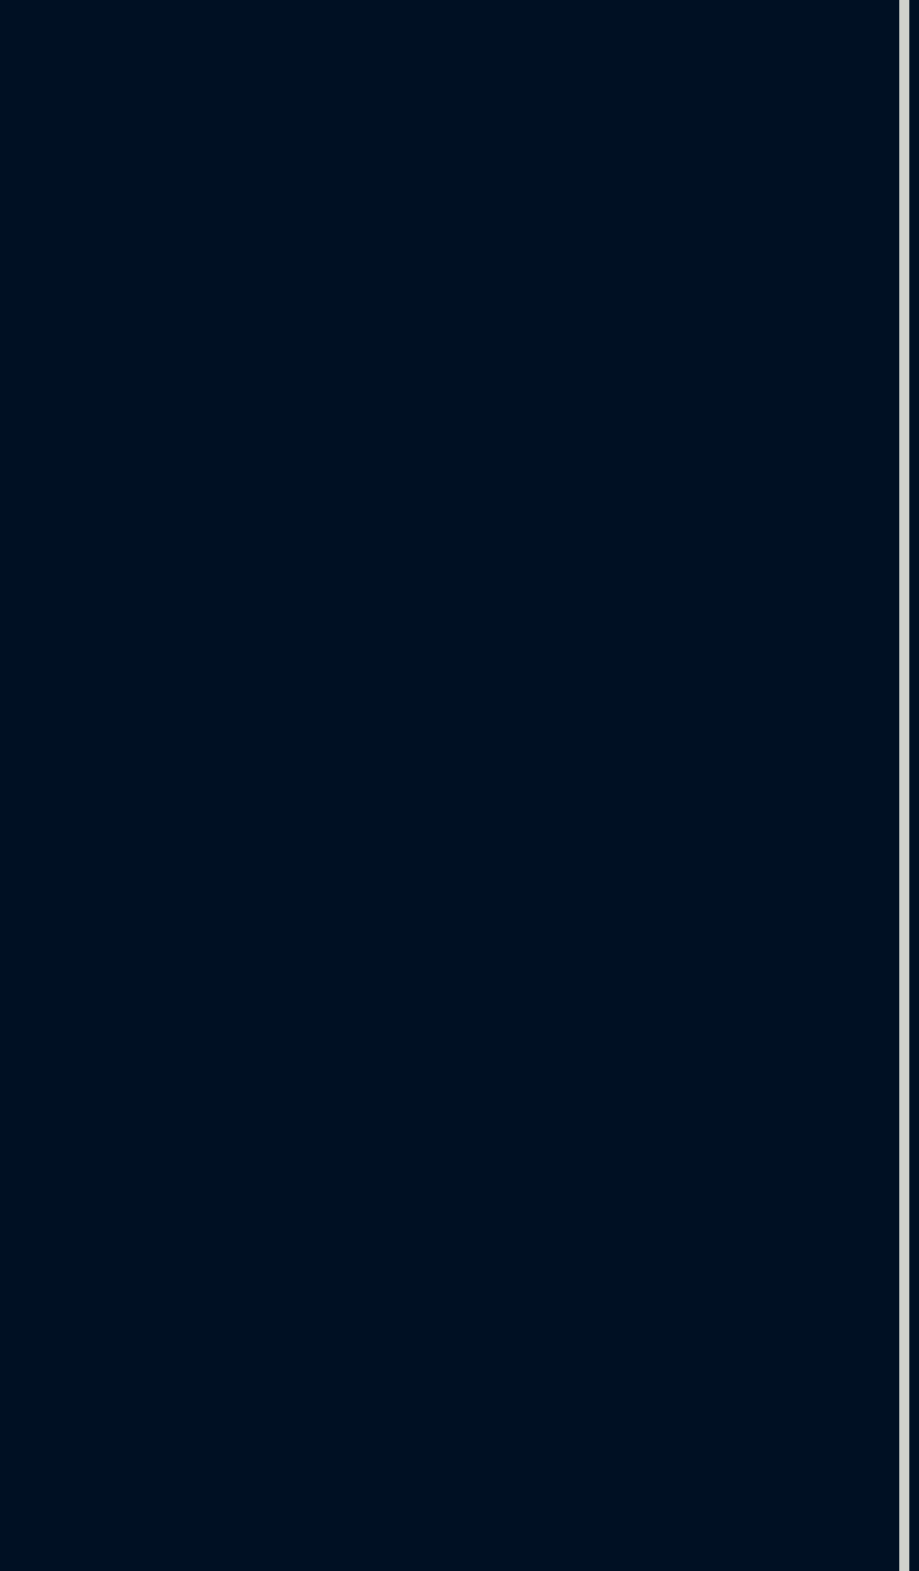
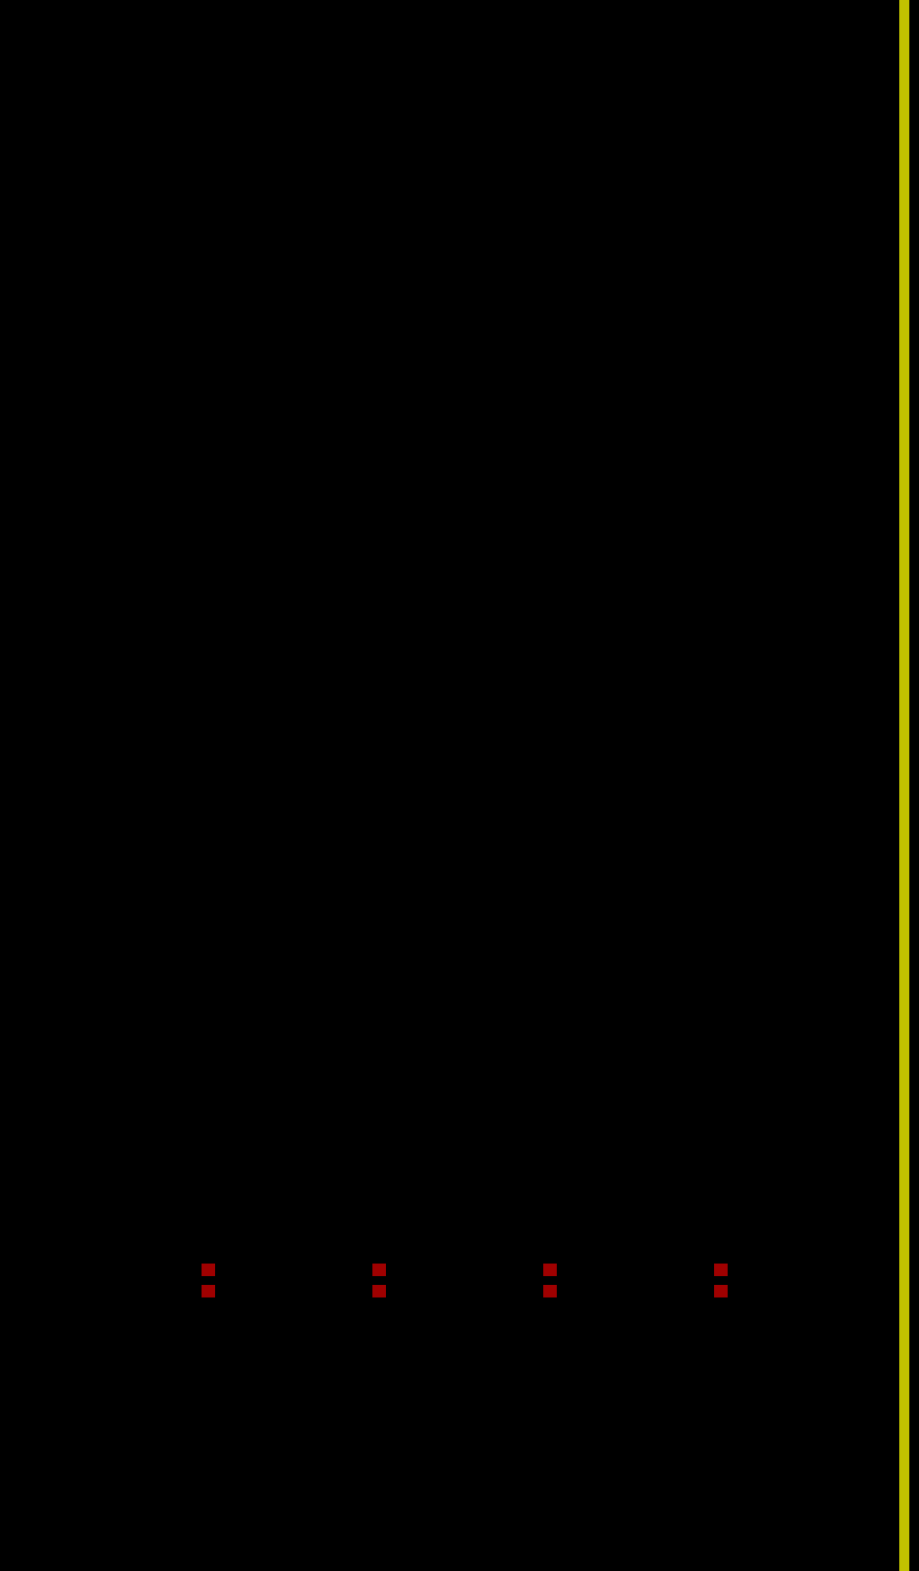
part: none -> (208, 1280)
part: none -> (379, 1280)
part: none -> (550, 1280)
part: none -> (720, 1280)

